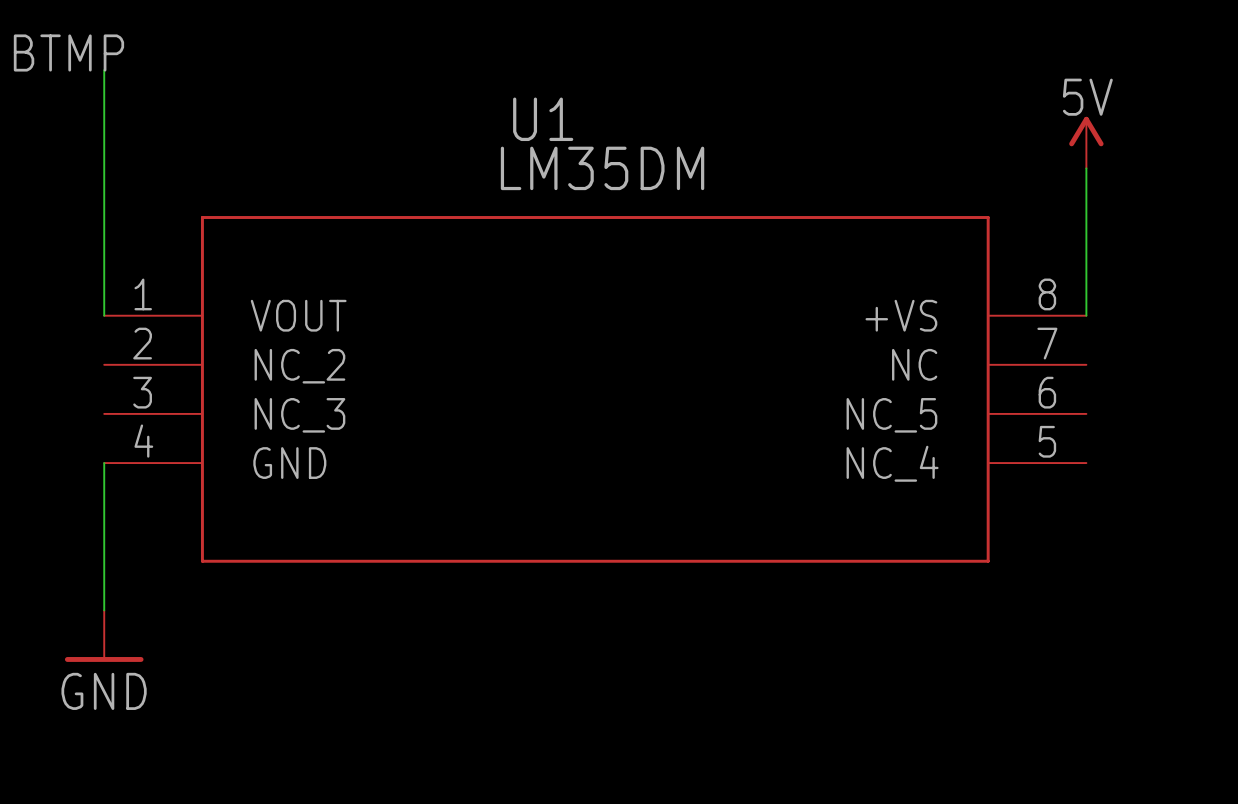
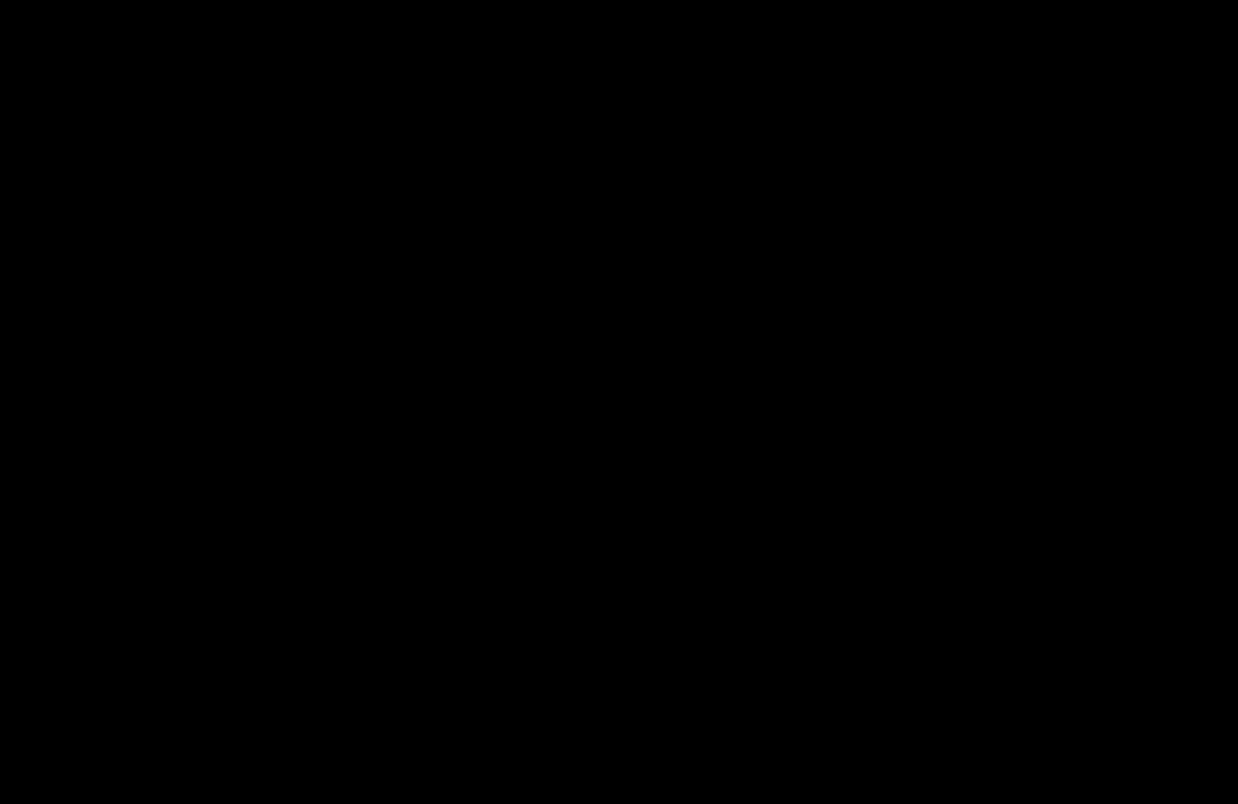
label: BTMP (68, 52) -> none
wire: (104, 70) (104, 315) -> none
power symbol: 5V (1086, 142) -> none
wire: (1086, 168) (1086, 315) -> none
U1: LM35DM (595, 389) -> none
wire: (104, 463) (104, 610) -> none
power symbol: GND (104, 636) -> none

